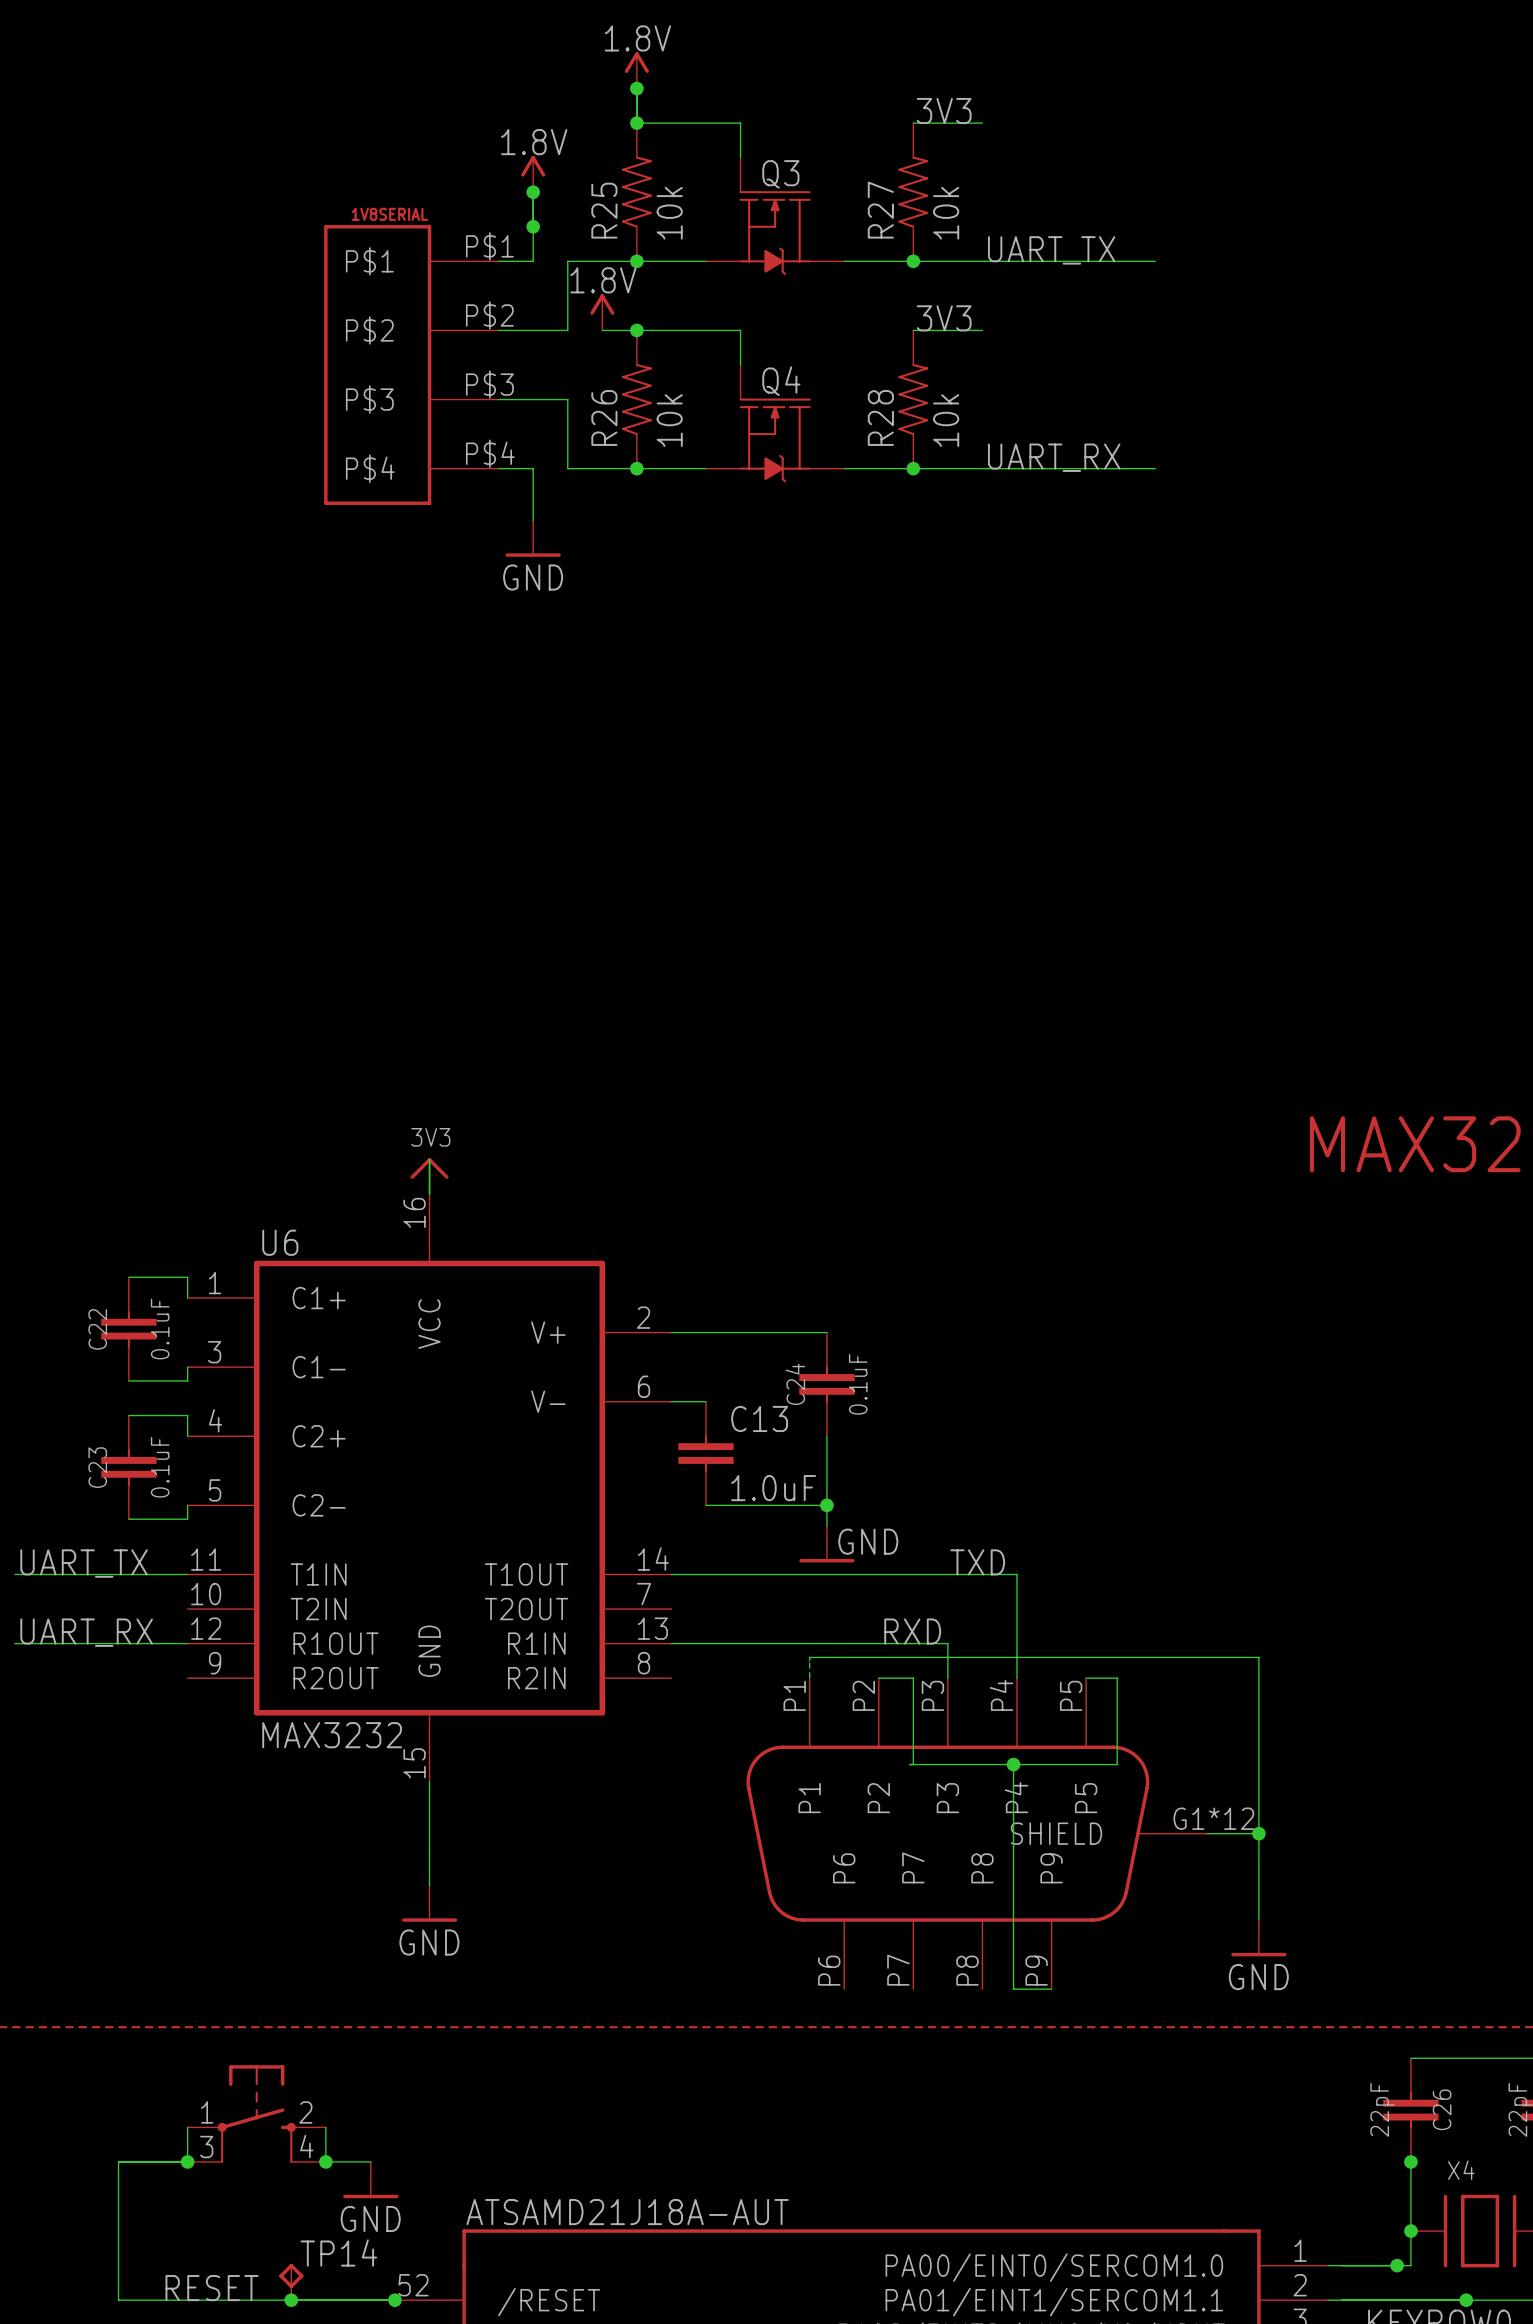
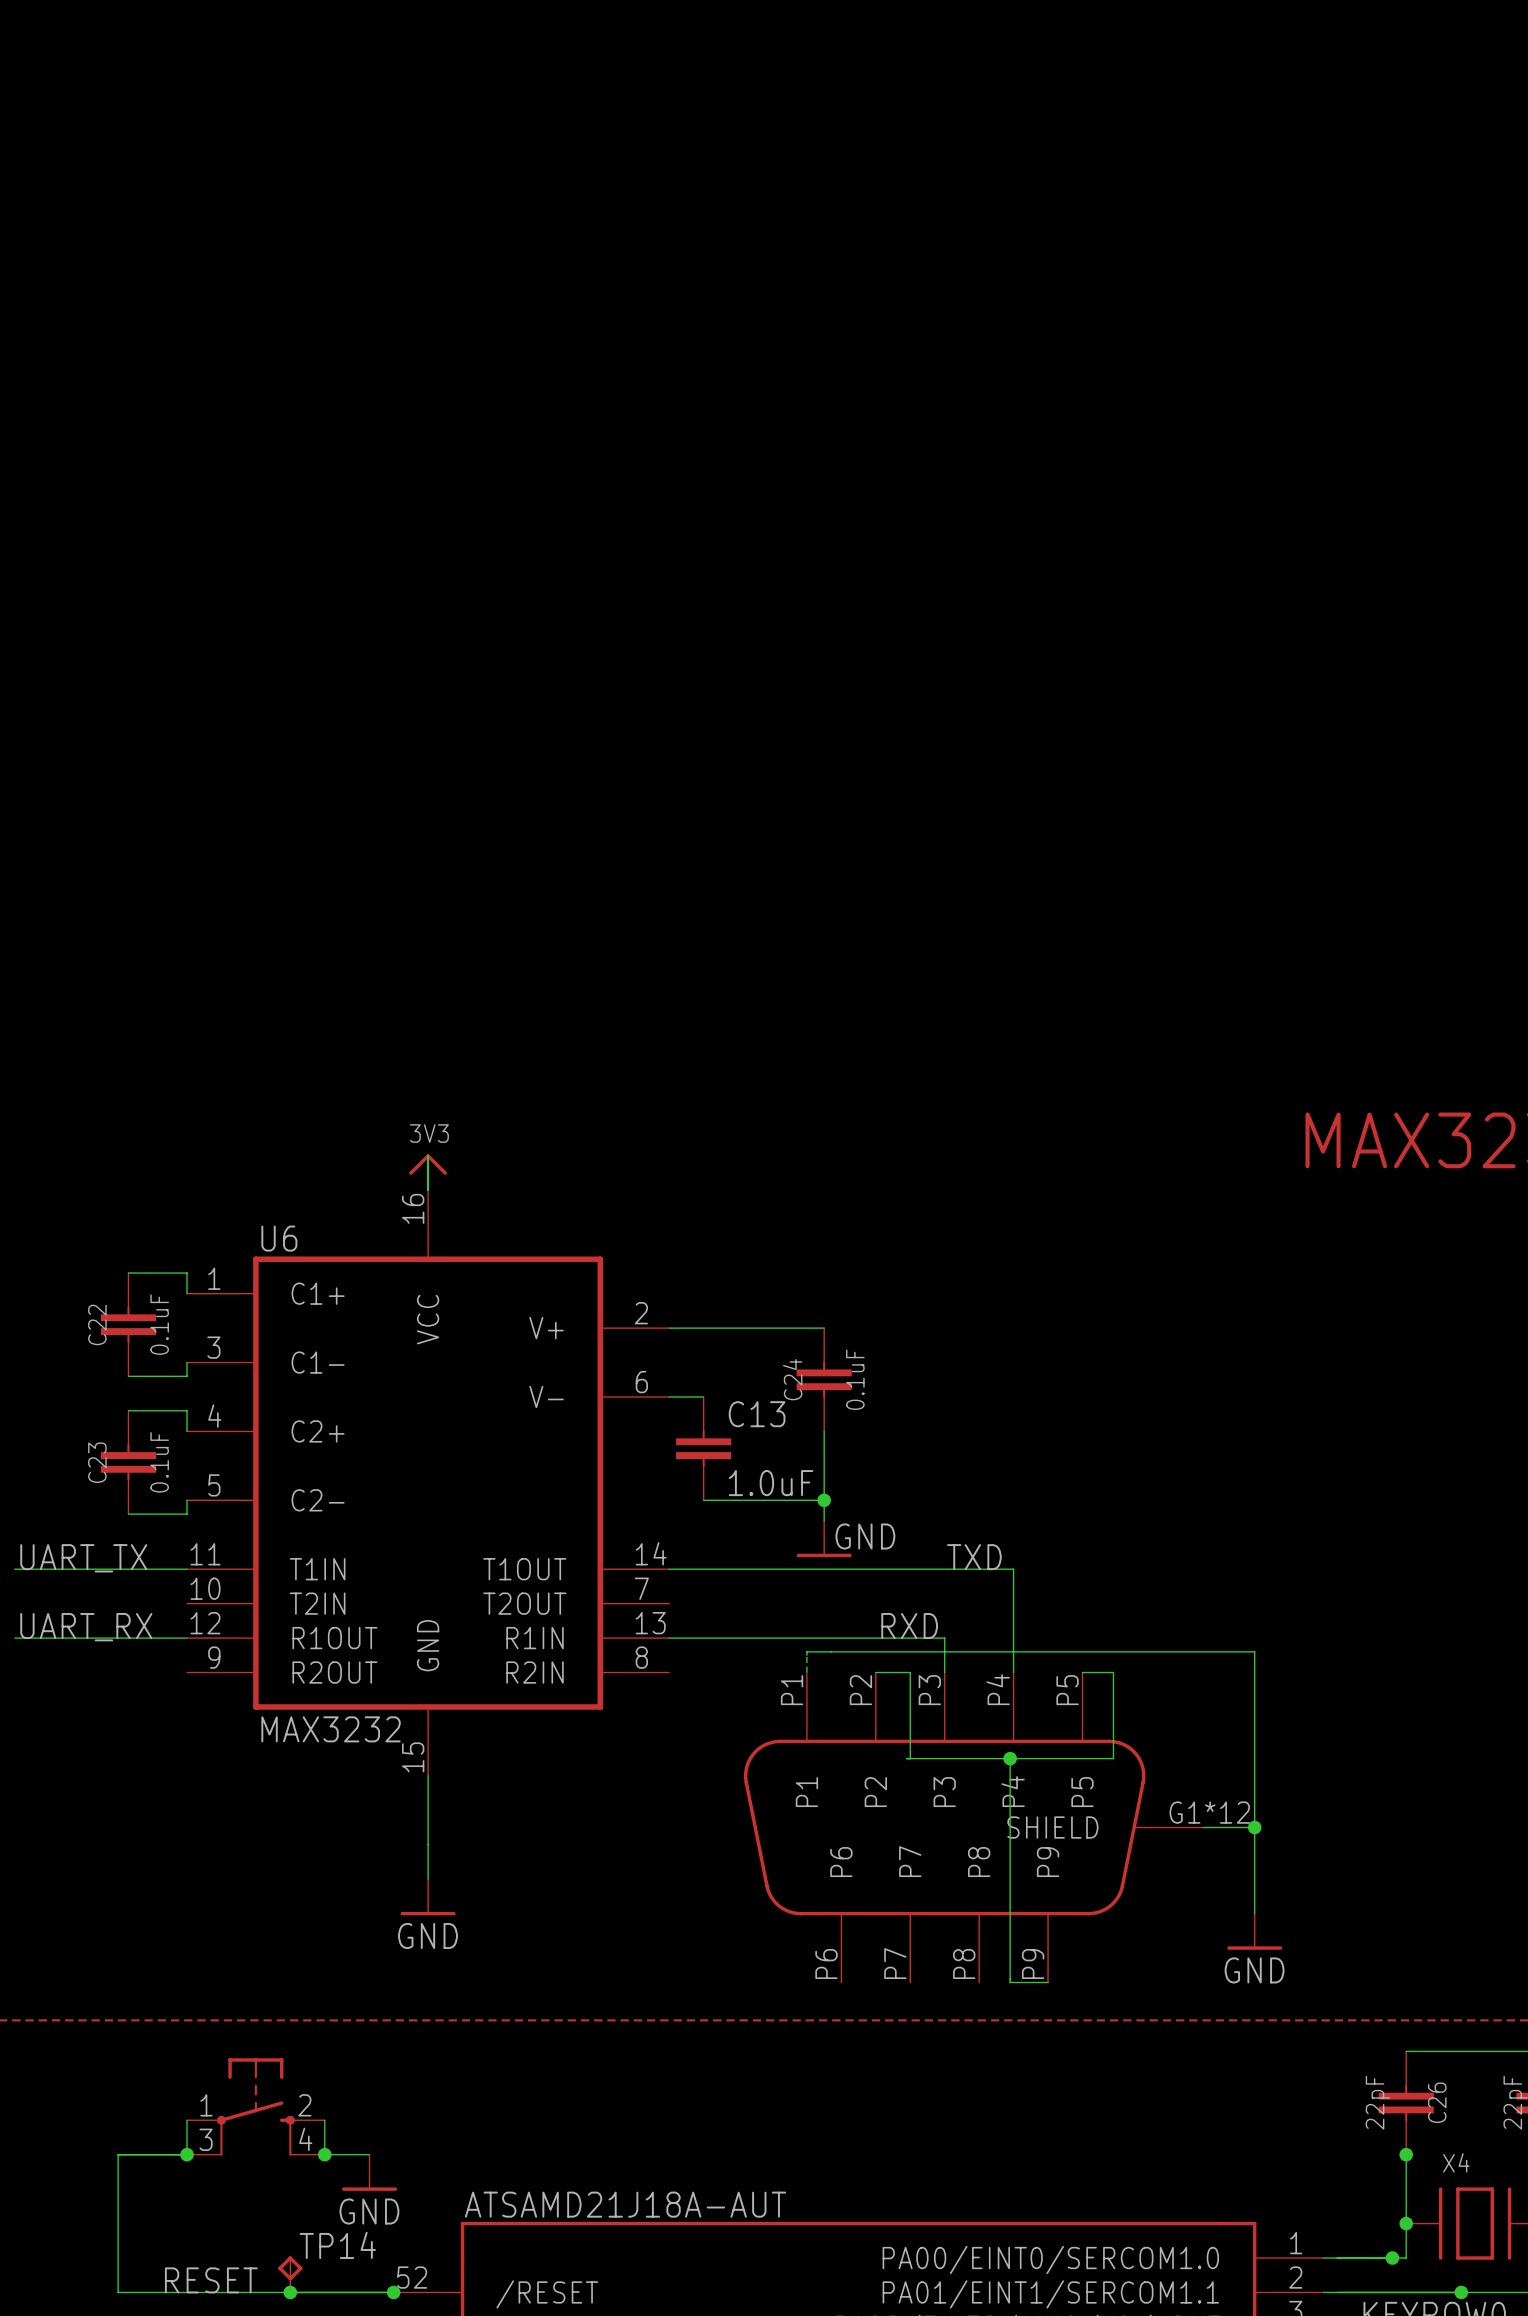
power symbol: 1.8V (636, 70) -> none
wire: (636, 88) (636, 123) (740, 123) (740, 157) -> none
junction: (636, 88) -> none
label: 3V3 (944, 111) -> none
junction: (636, 123) -> none
wire: (913, 123) (982, 123) -> none
power symbol: 1.8V (533, 174) -> none
wire: (533, 192) (533, 261) (498, 261) -> none
junction: (533, 192) -> none
R25: 10k (636, 192) -> none
R27: 10k (913, 192) -> none
Q3: (775, 216) -> none
junction: (533, 226) -> none
label: UART_TX (1051, 250) -> none
junction: (636, 261) -> none
wire: (705, 261) (567, 261) (567, 330) (498, 330) -> none
wire: (844, 261) (1155, 261) -> none
junction: (913, 261) -> none
power symbol: 1.8V (602, 312) -> none
label: 3V3 (944, 318) -> none
wire: (602, 330) (740, 330) (740, 365) -> none
junction: (636, 330) -> none
wire: (913, 330) (982, 330) -> none
1V8SERIAL: (411, 365) -> none
wire: (498, 399) (567, 399) (567, 468) (705, 468) -> none
R26: 10k (636, 399) -> none
R28: 10k (913, 399) -> none
Q4: (775, 423) -> none
label: UART_RX (1054, 457) -> none
wire: (498, 468) (533, 468) (533, 520) -> none
junction: (636, 468) -> none
wire: (844, 468) (1155, 468) -> none
junction: (913, 468) -> none
power symbol: GND (533, 538) -> none

